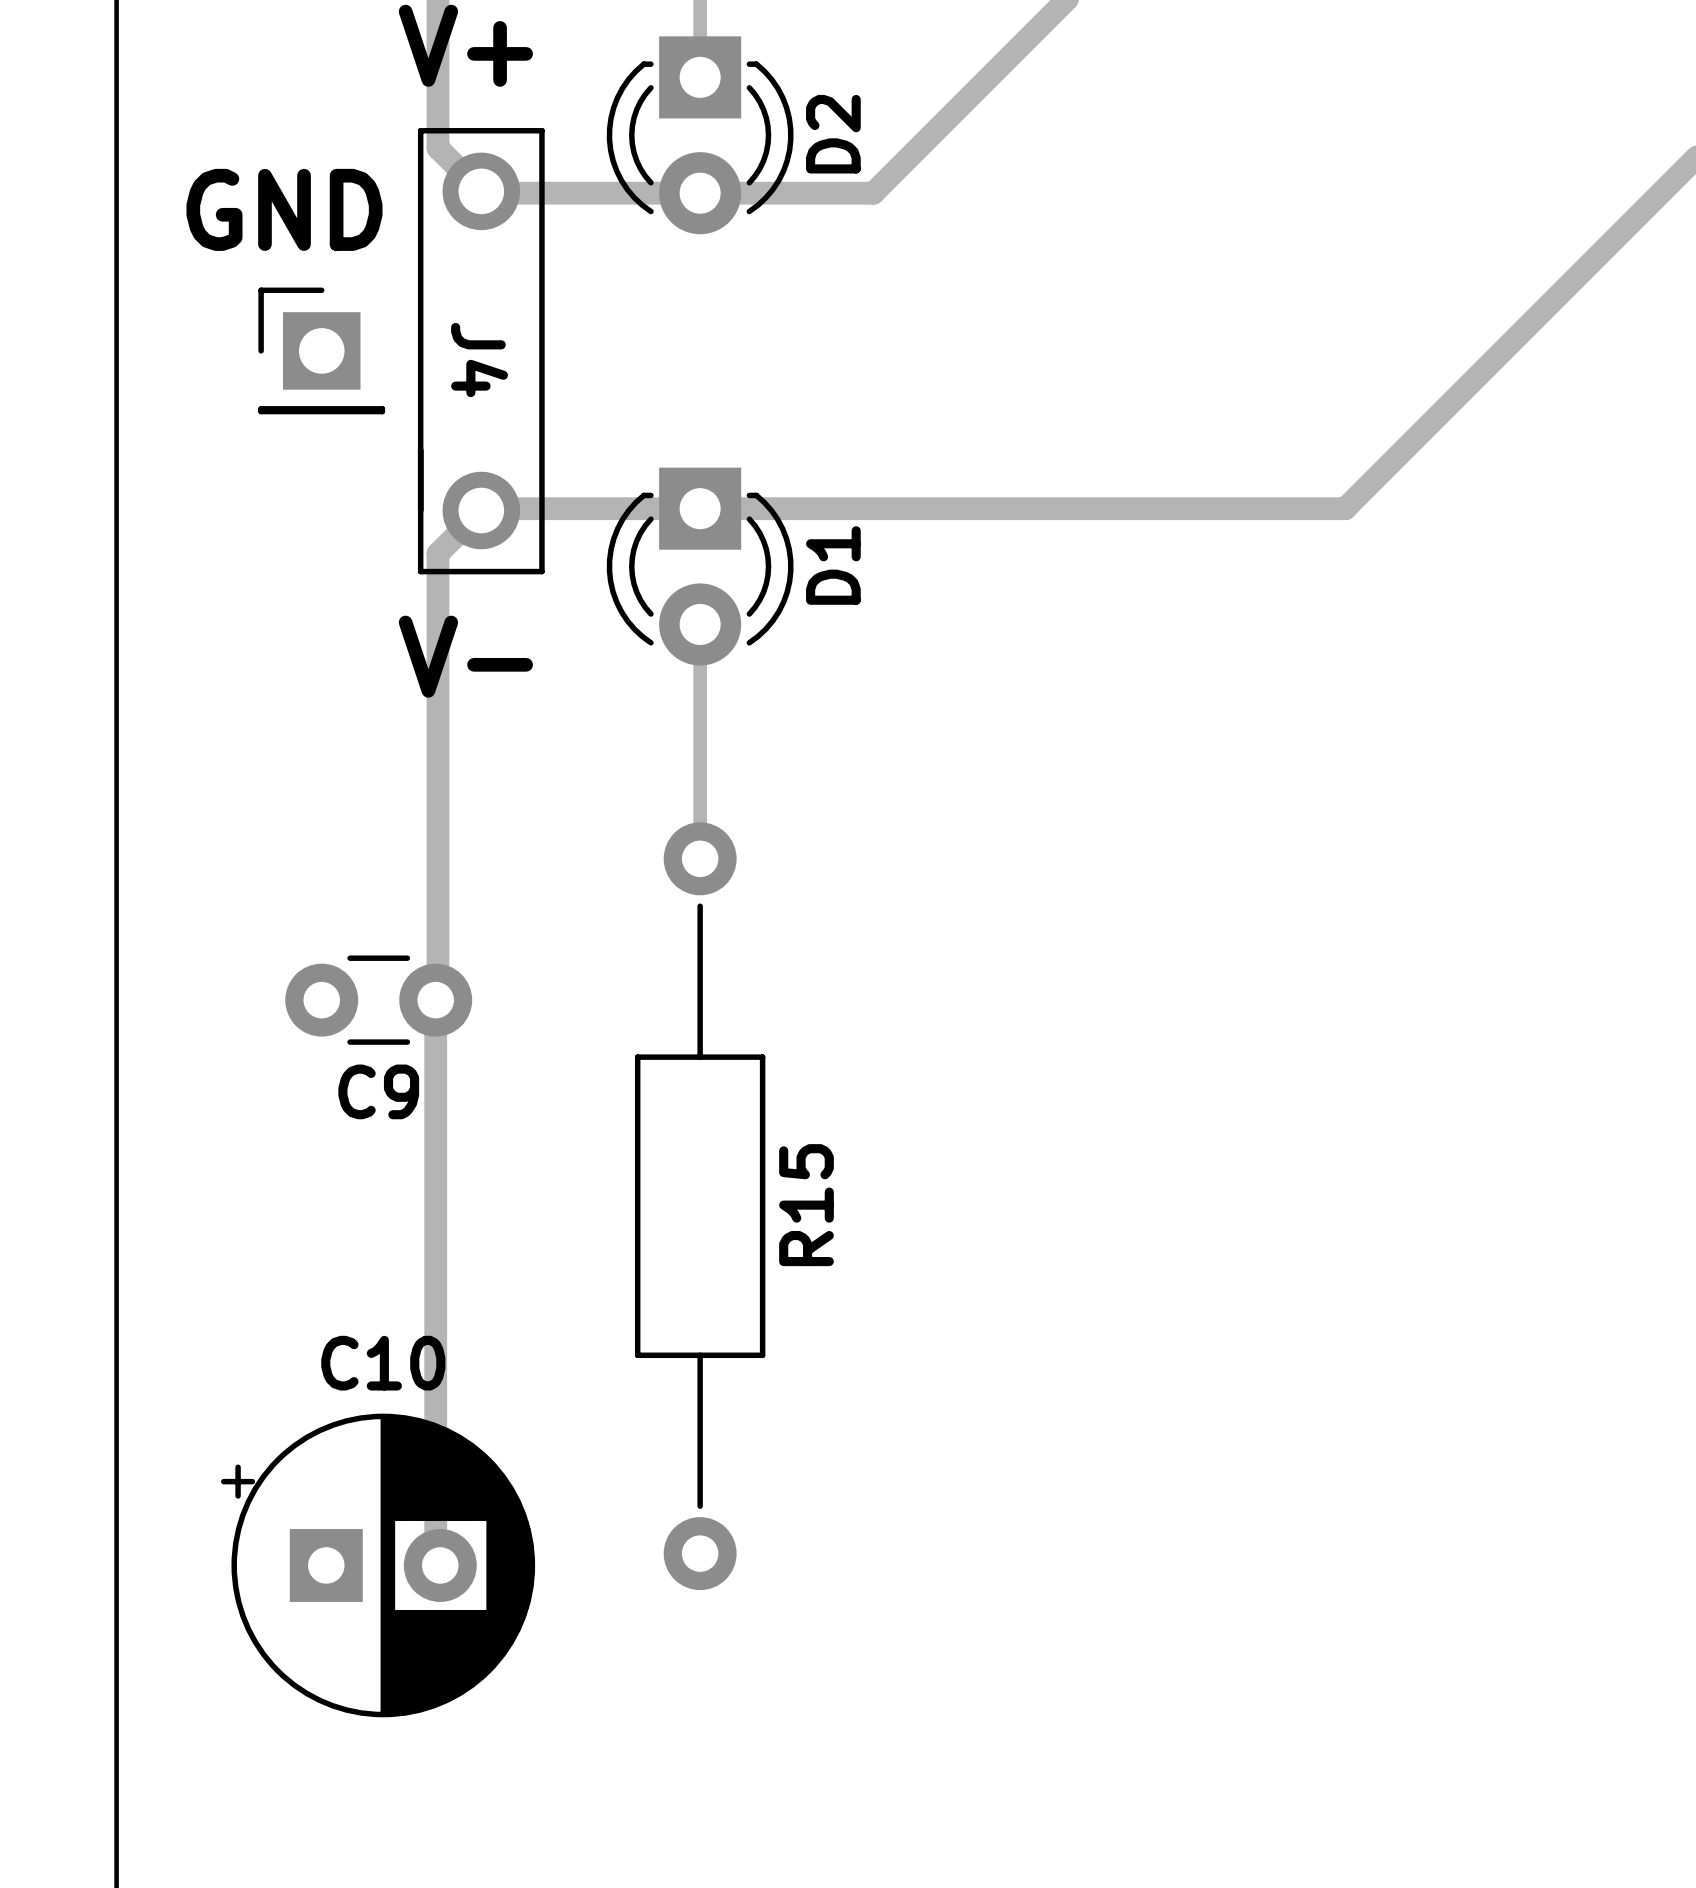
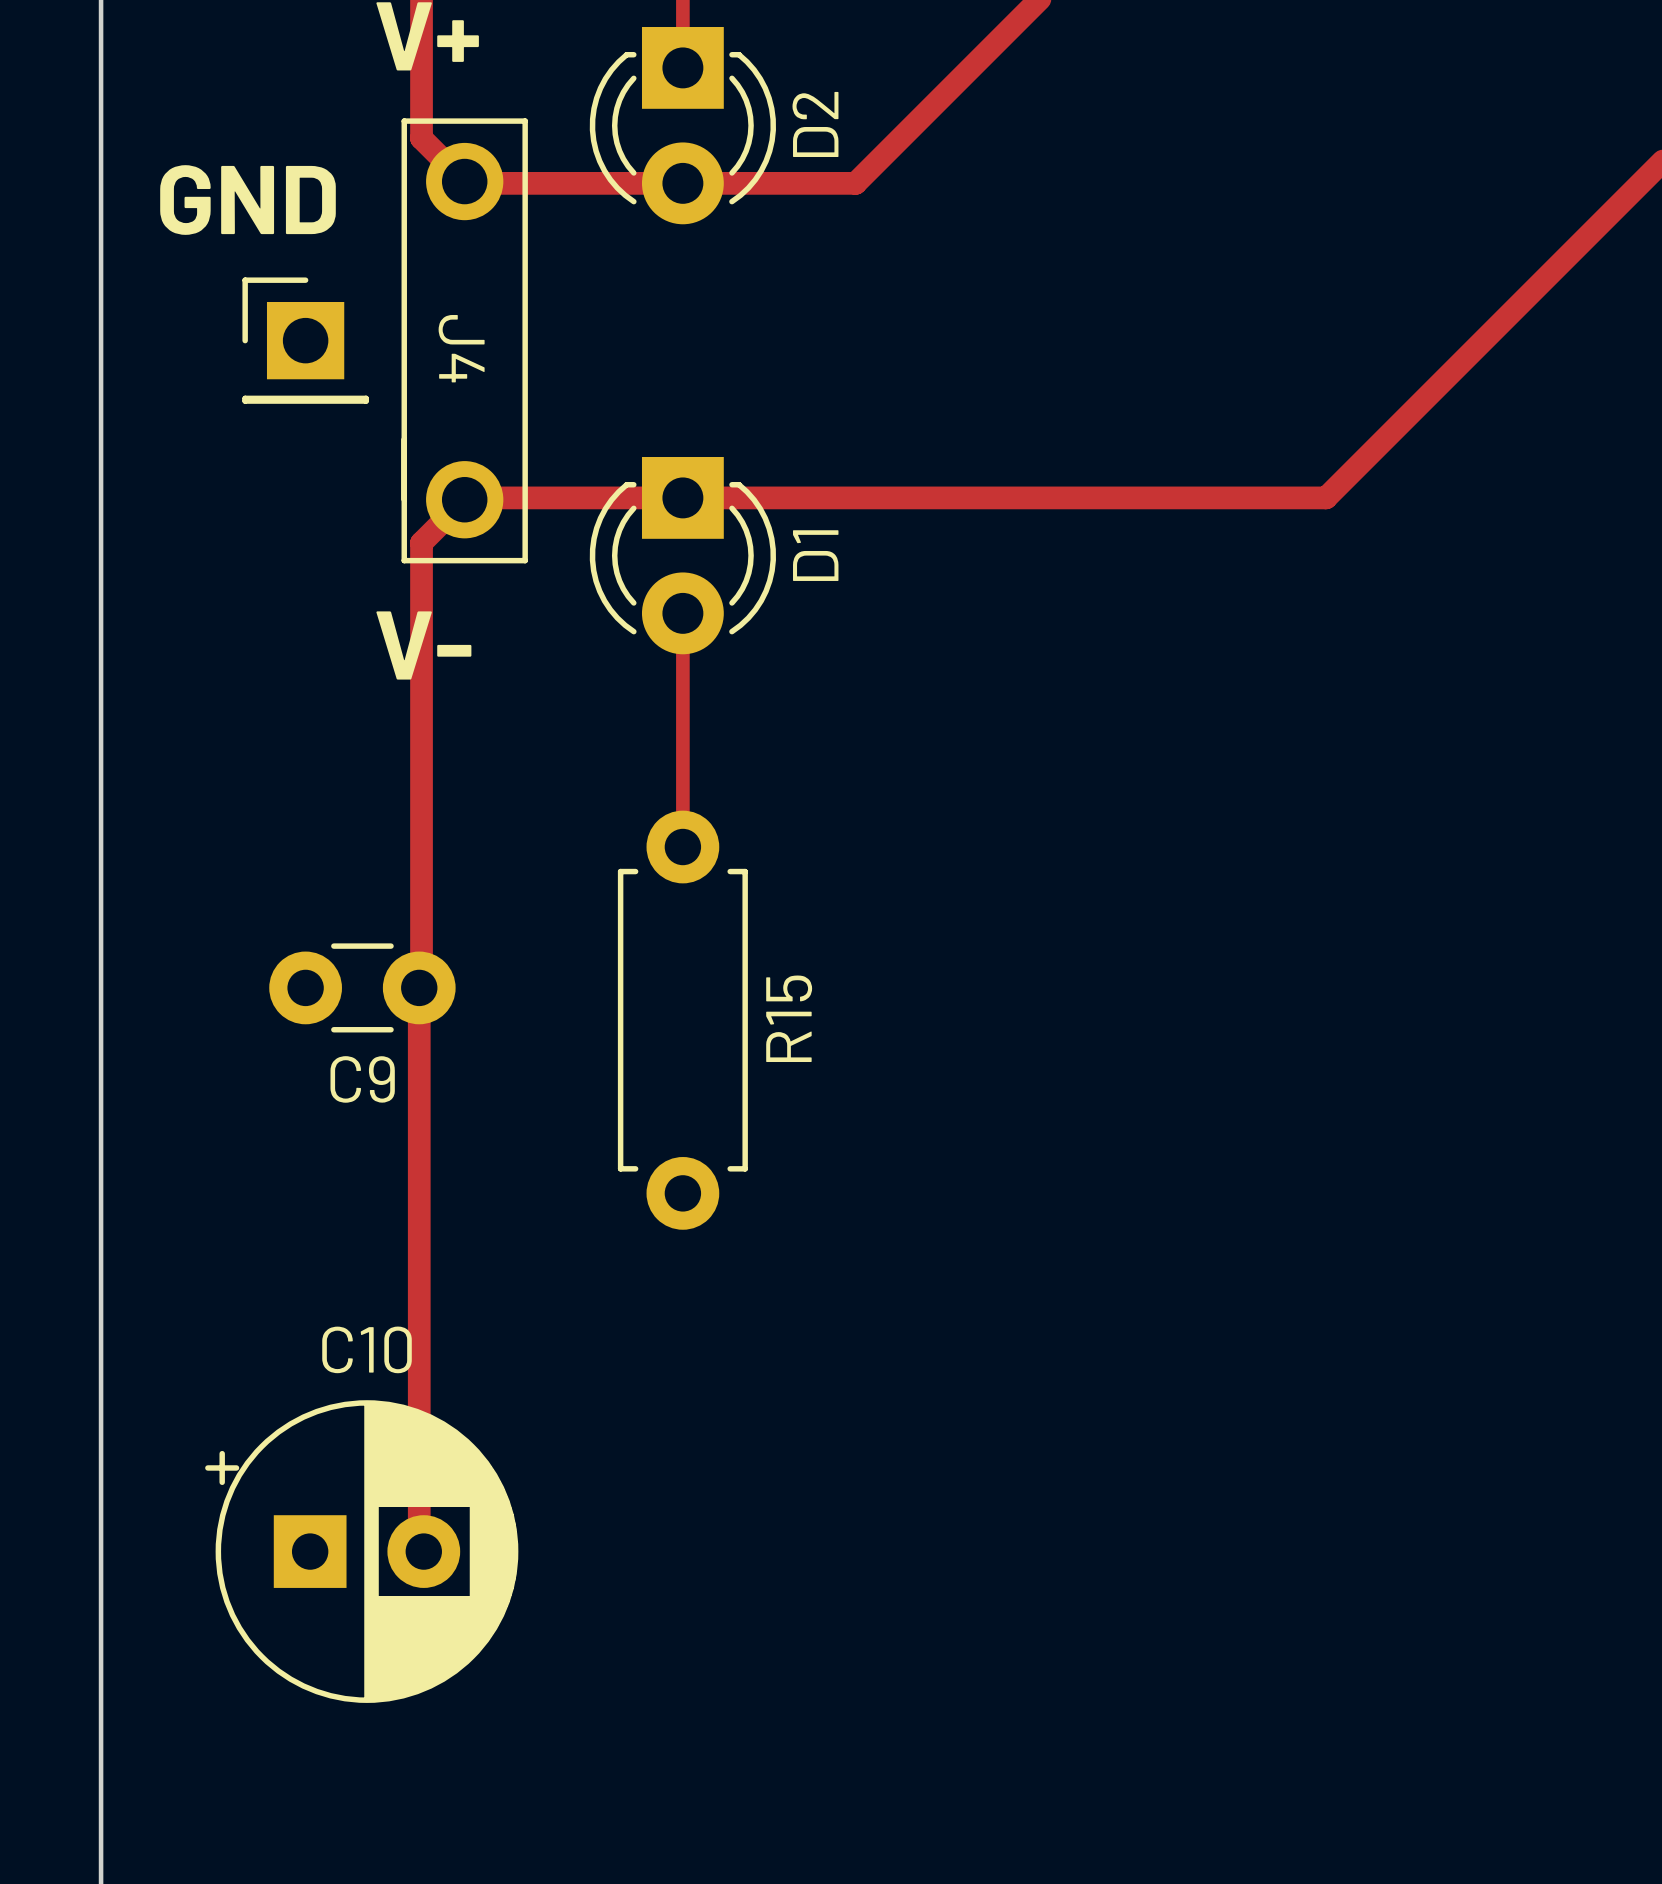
R15 footprint: [634, 822, 766, 1591] -> [617, 810, 748, 1230]

